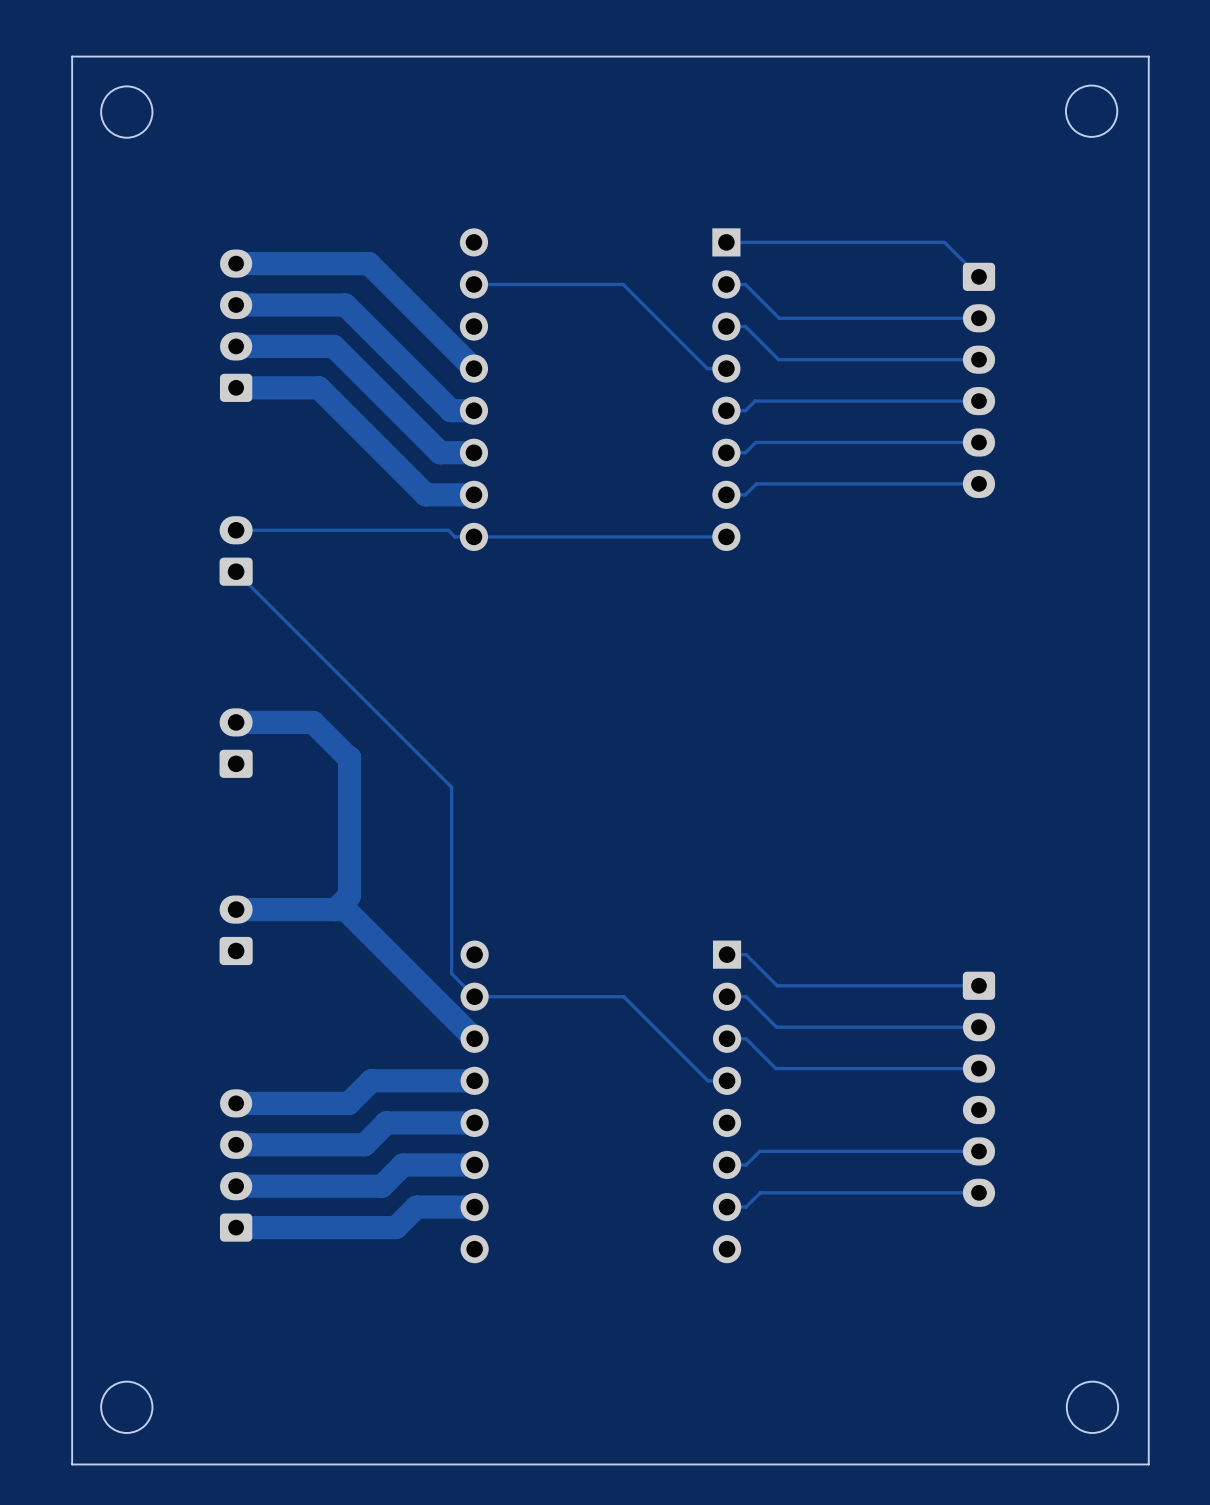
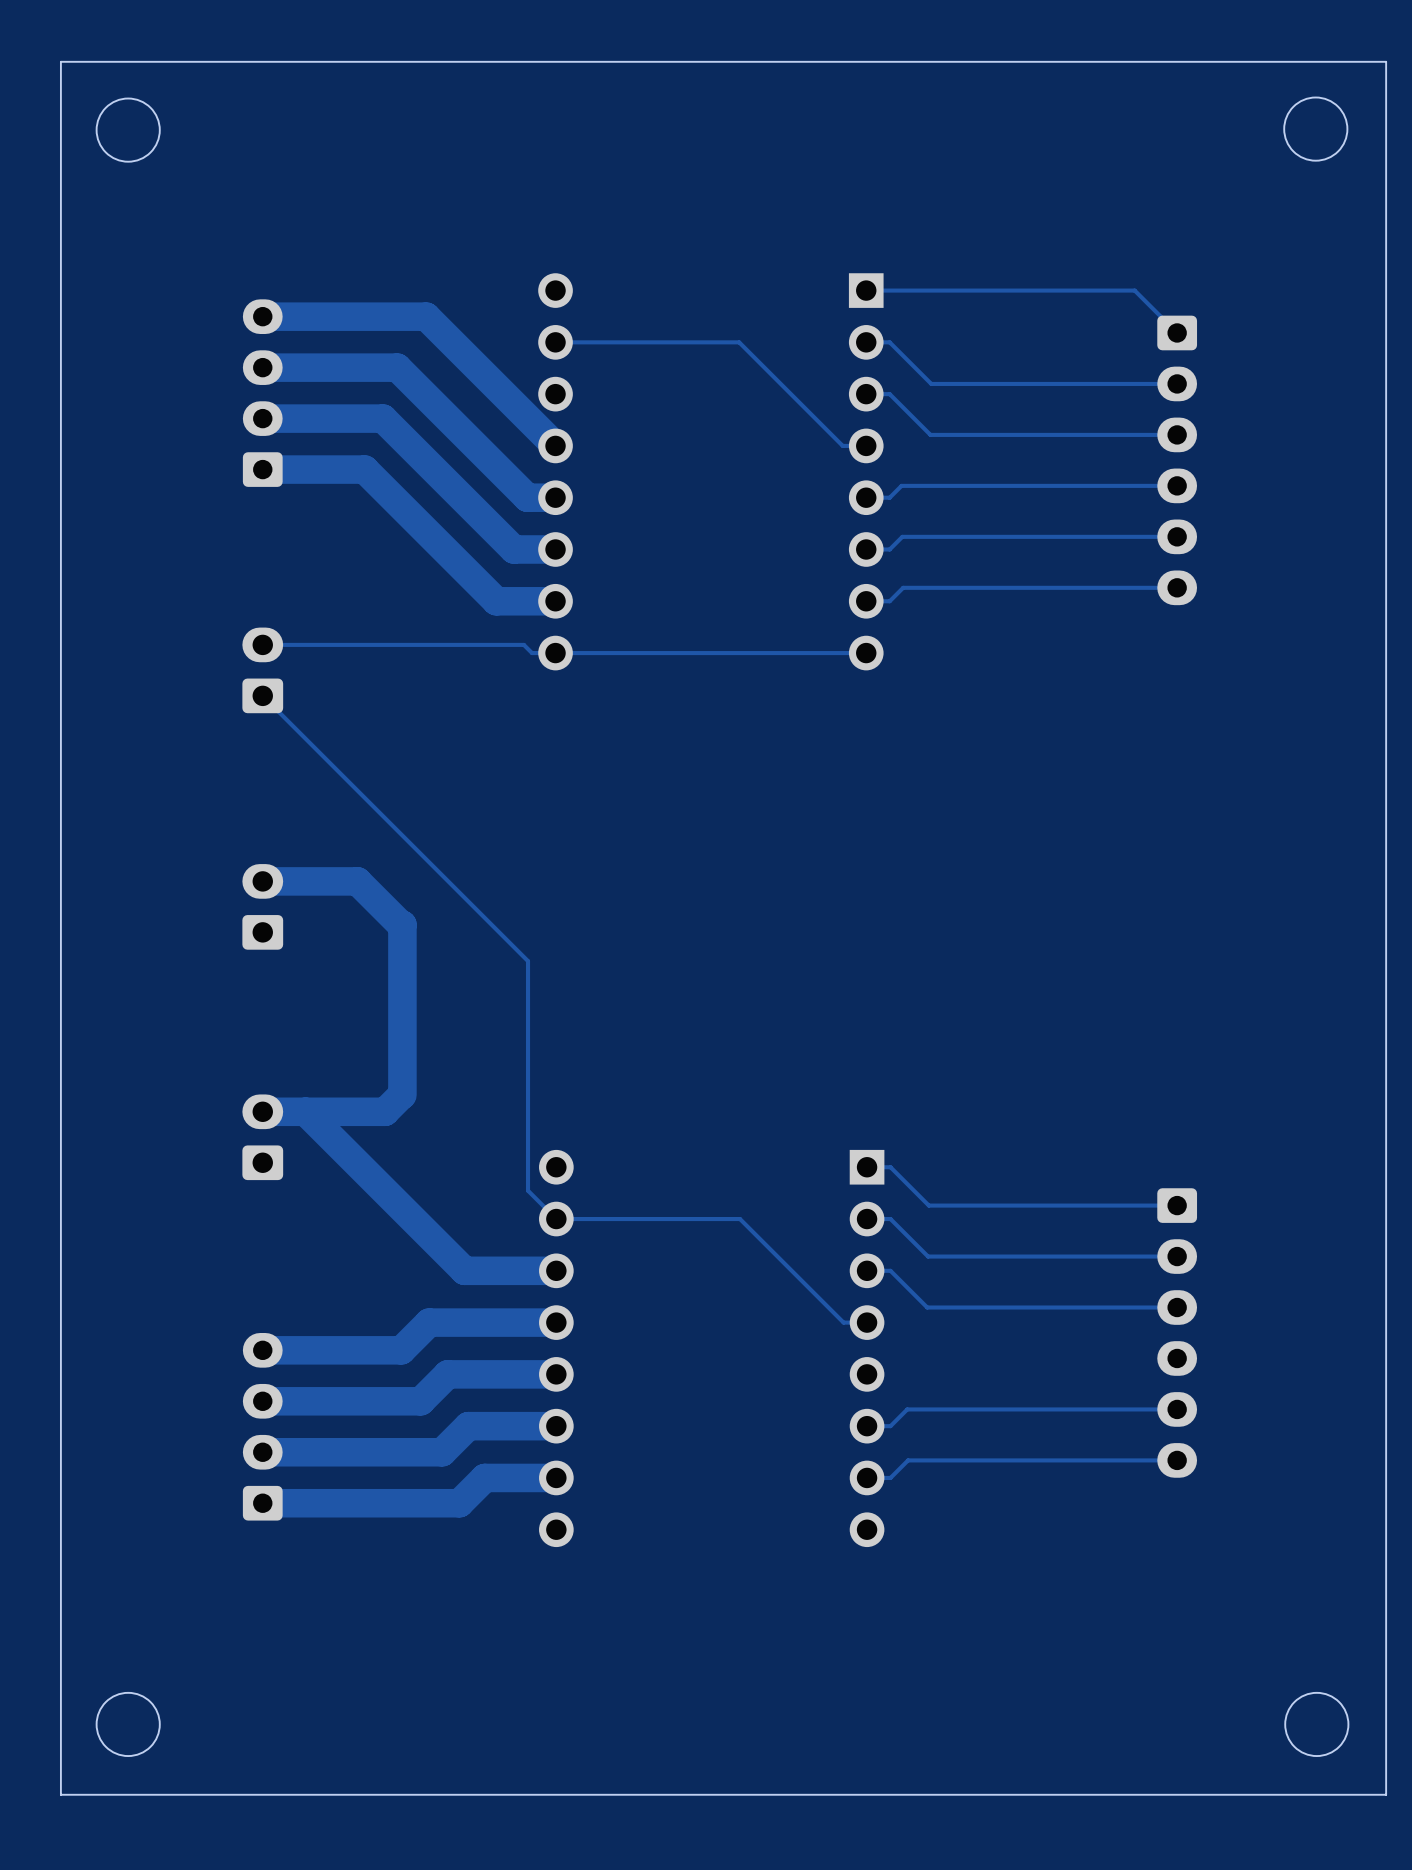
track: (335, 909) (345, 909) (474, 1038) -> (305, 1111) (464, 1270) (556, 1270)

